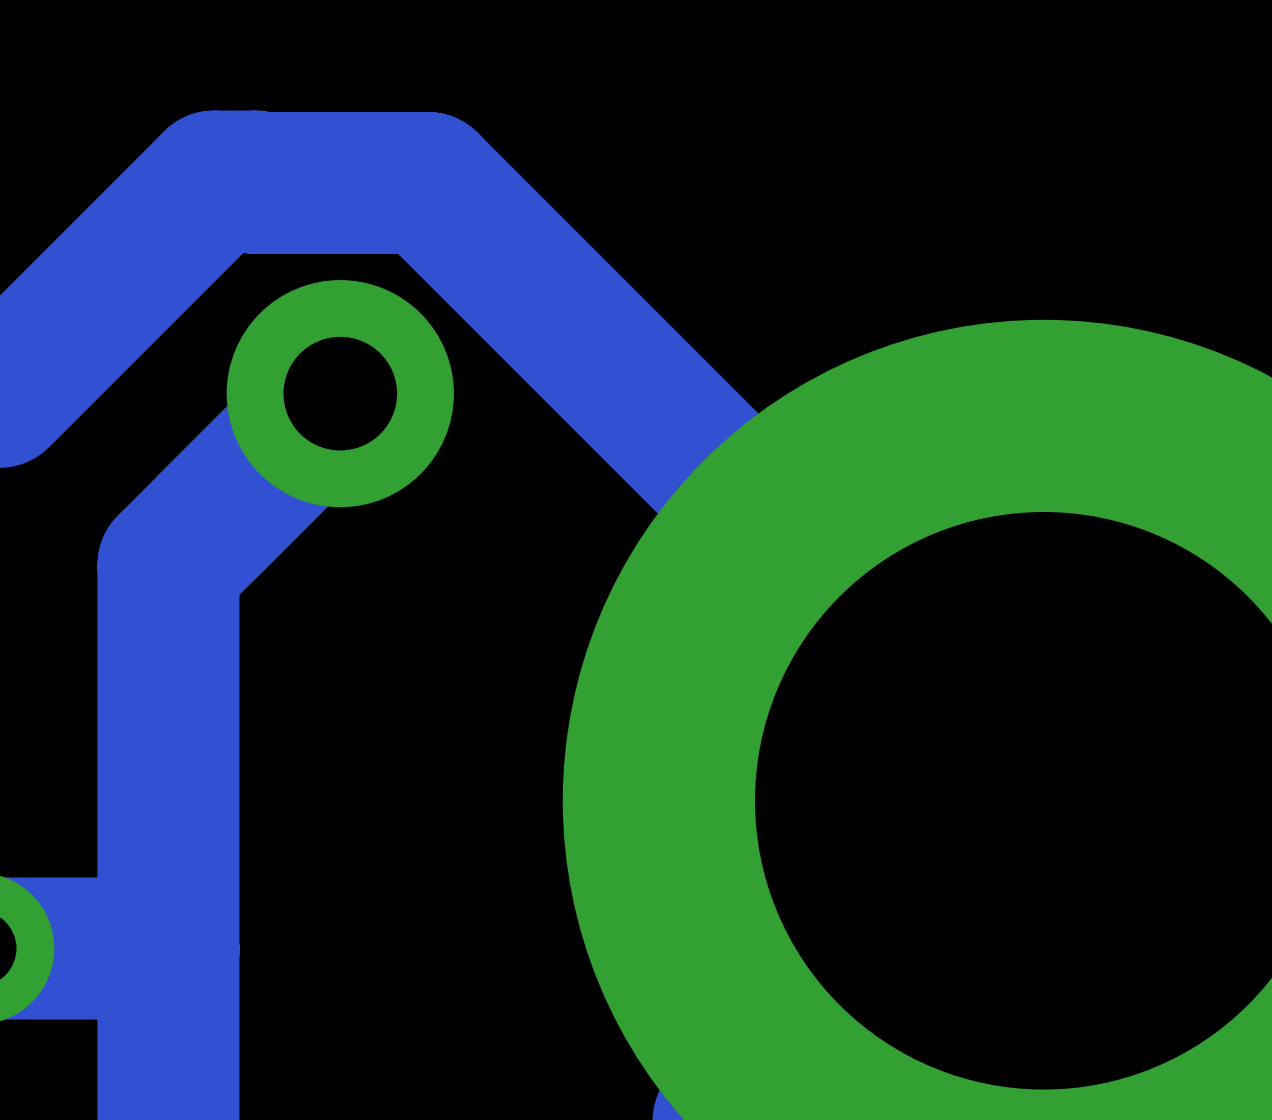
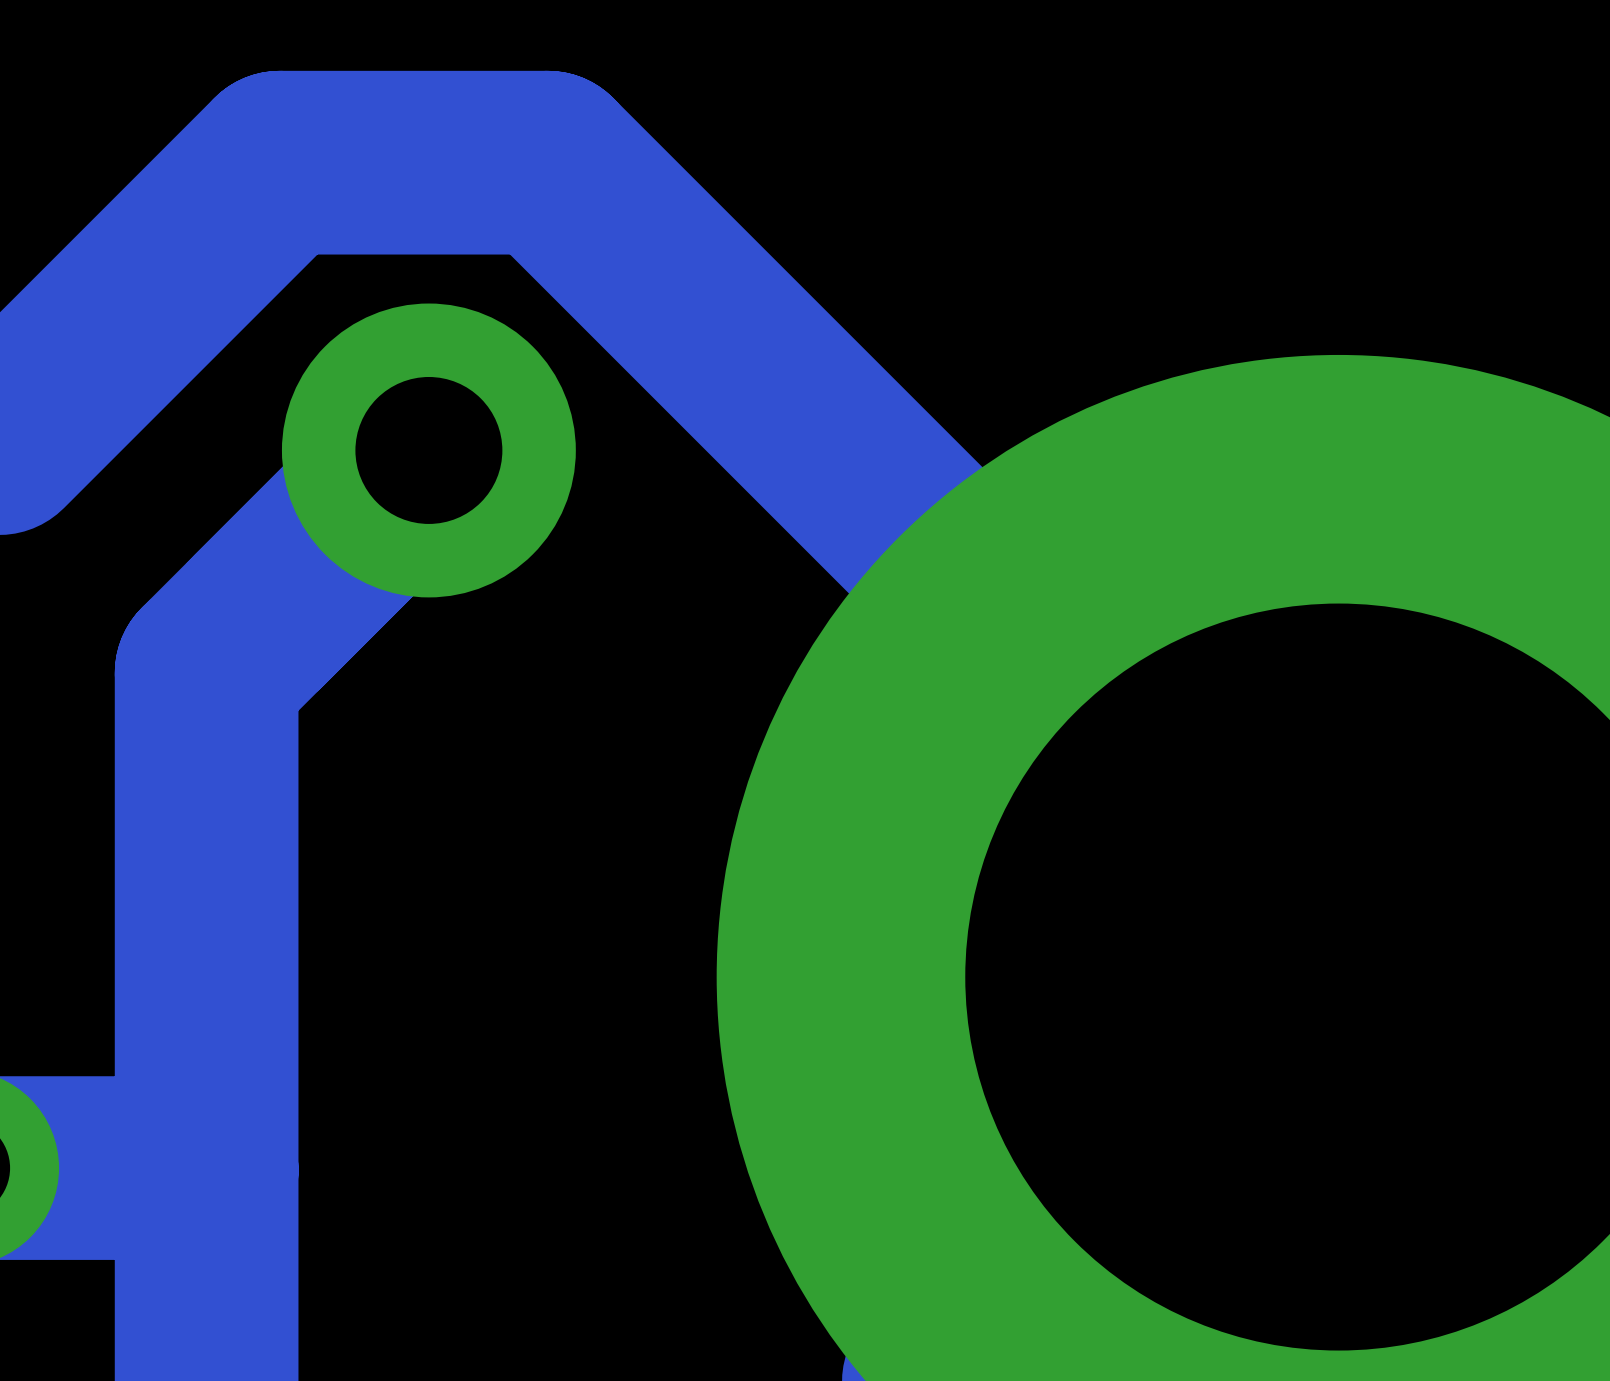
bottom track: (214, 181) (427, 182) (1043, 799) -> (266, 176) (279, 162) (548, 162) (1360, 975) (1358, 977) (1338, 977)

